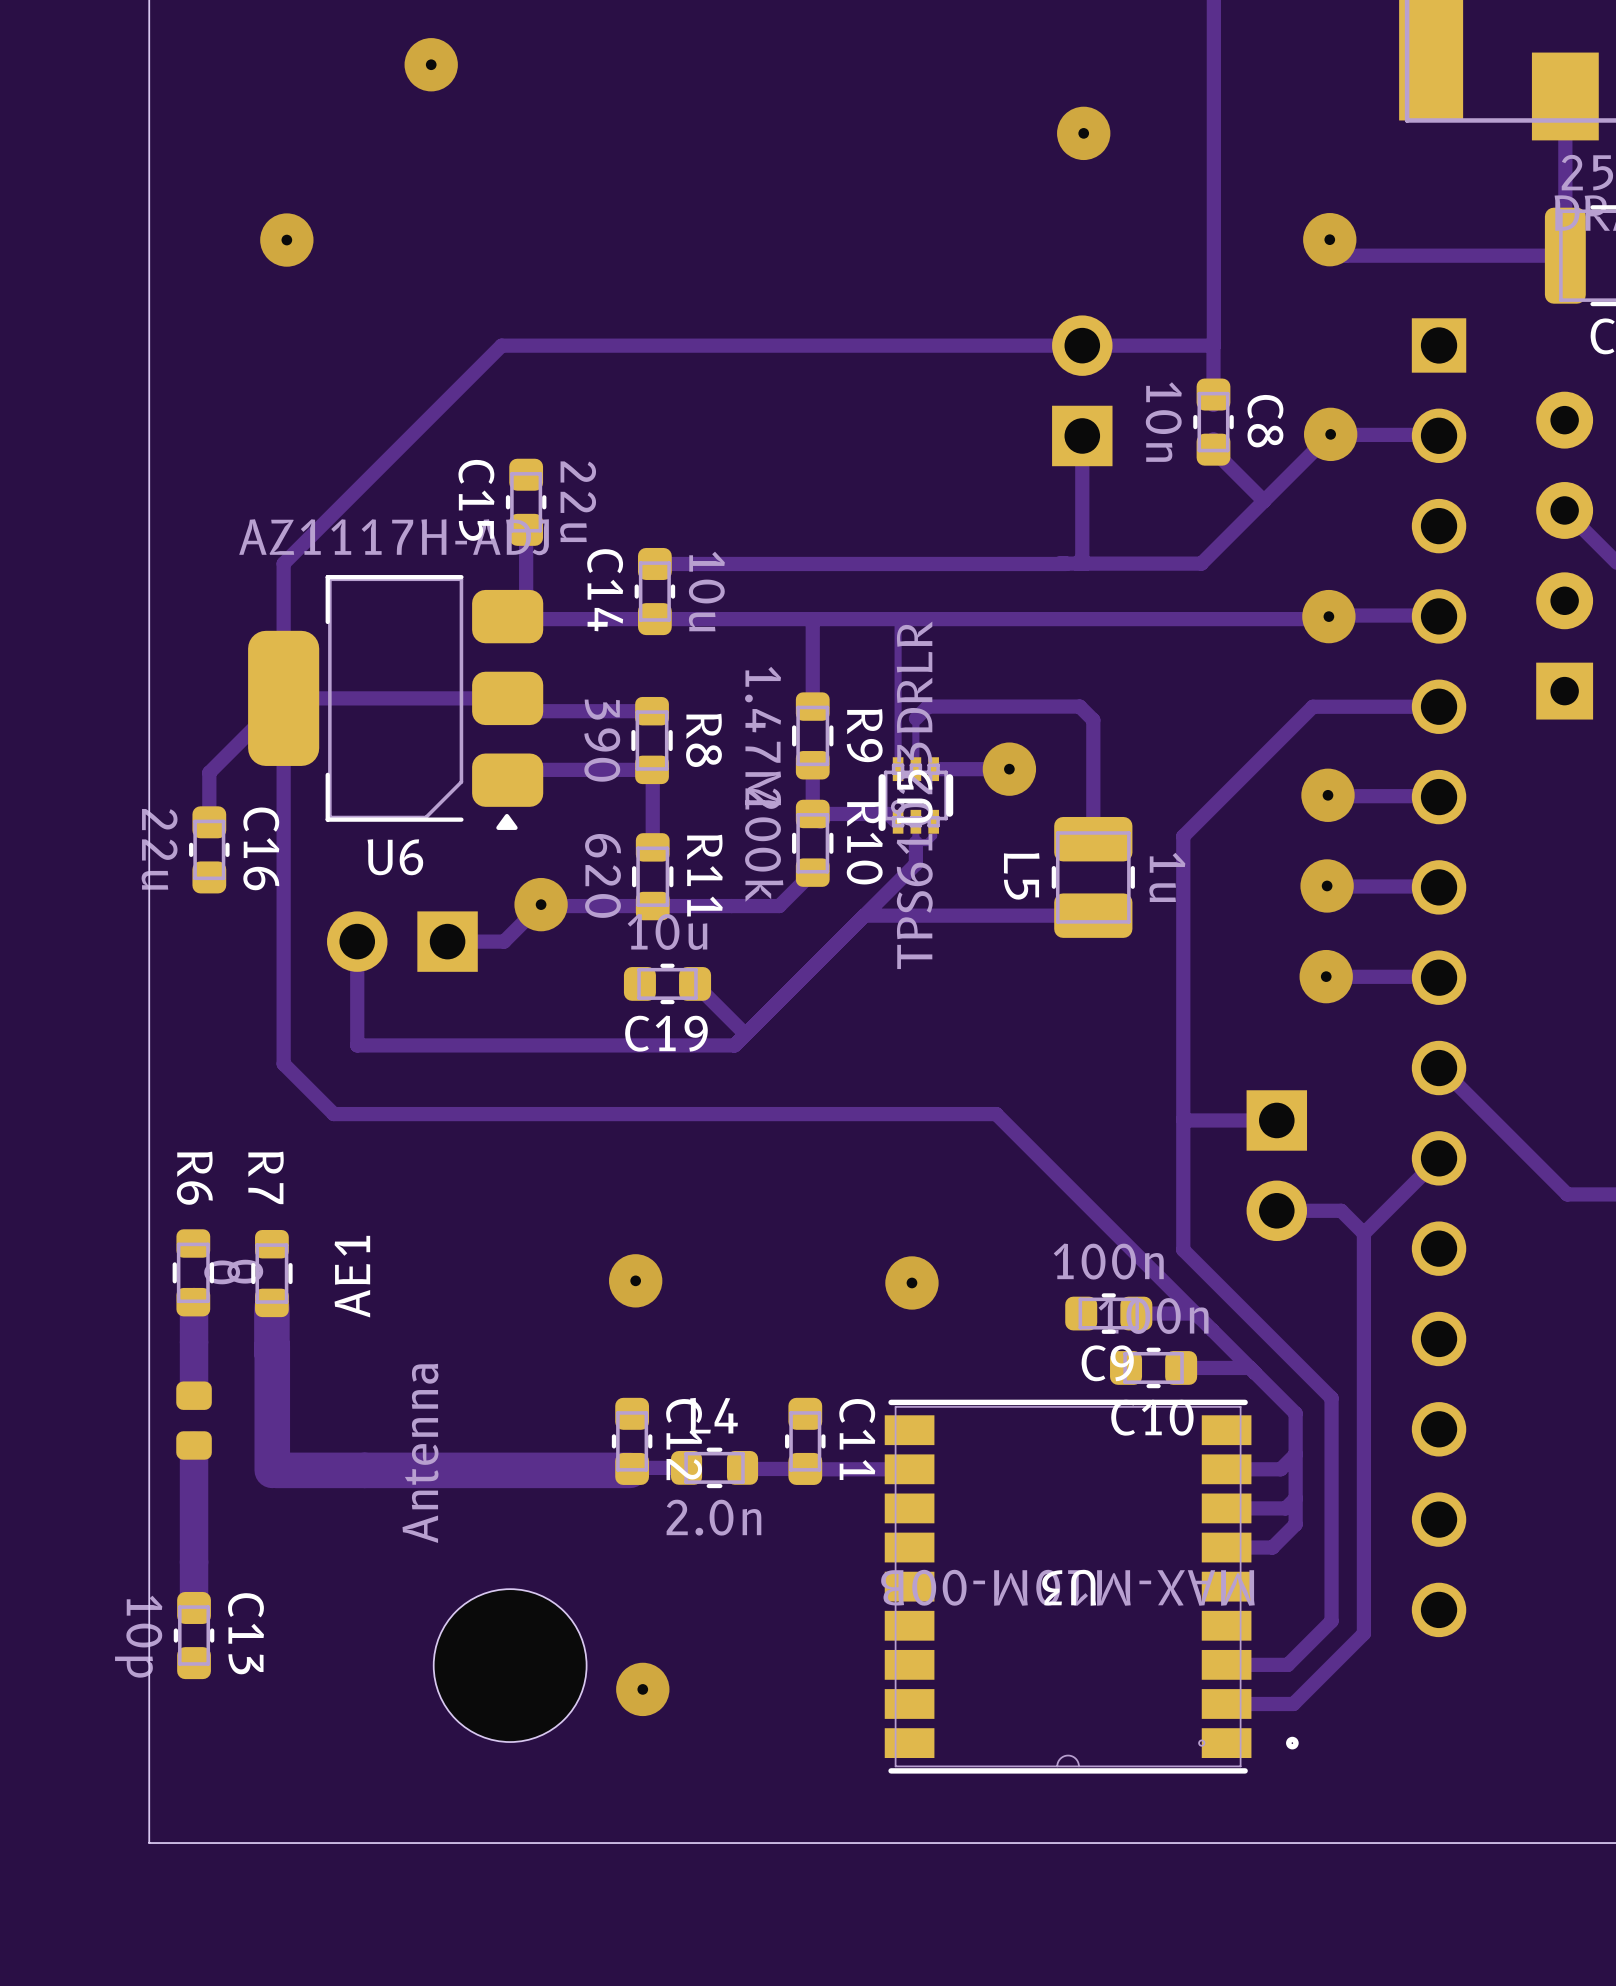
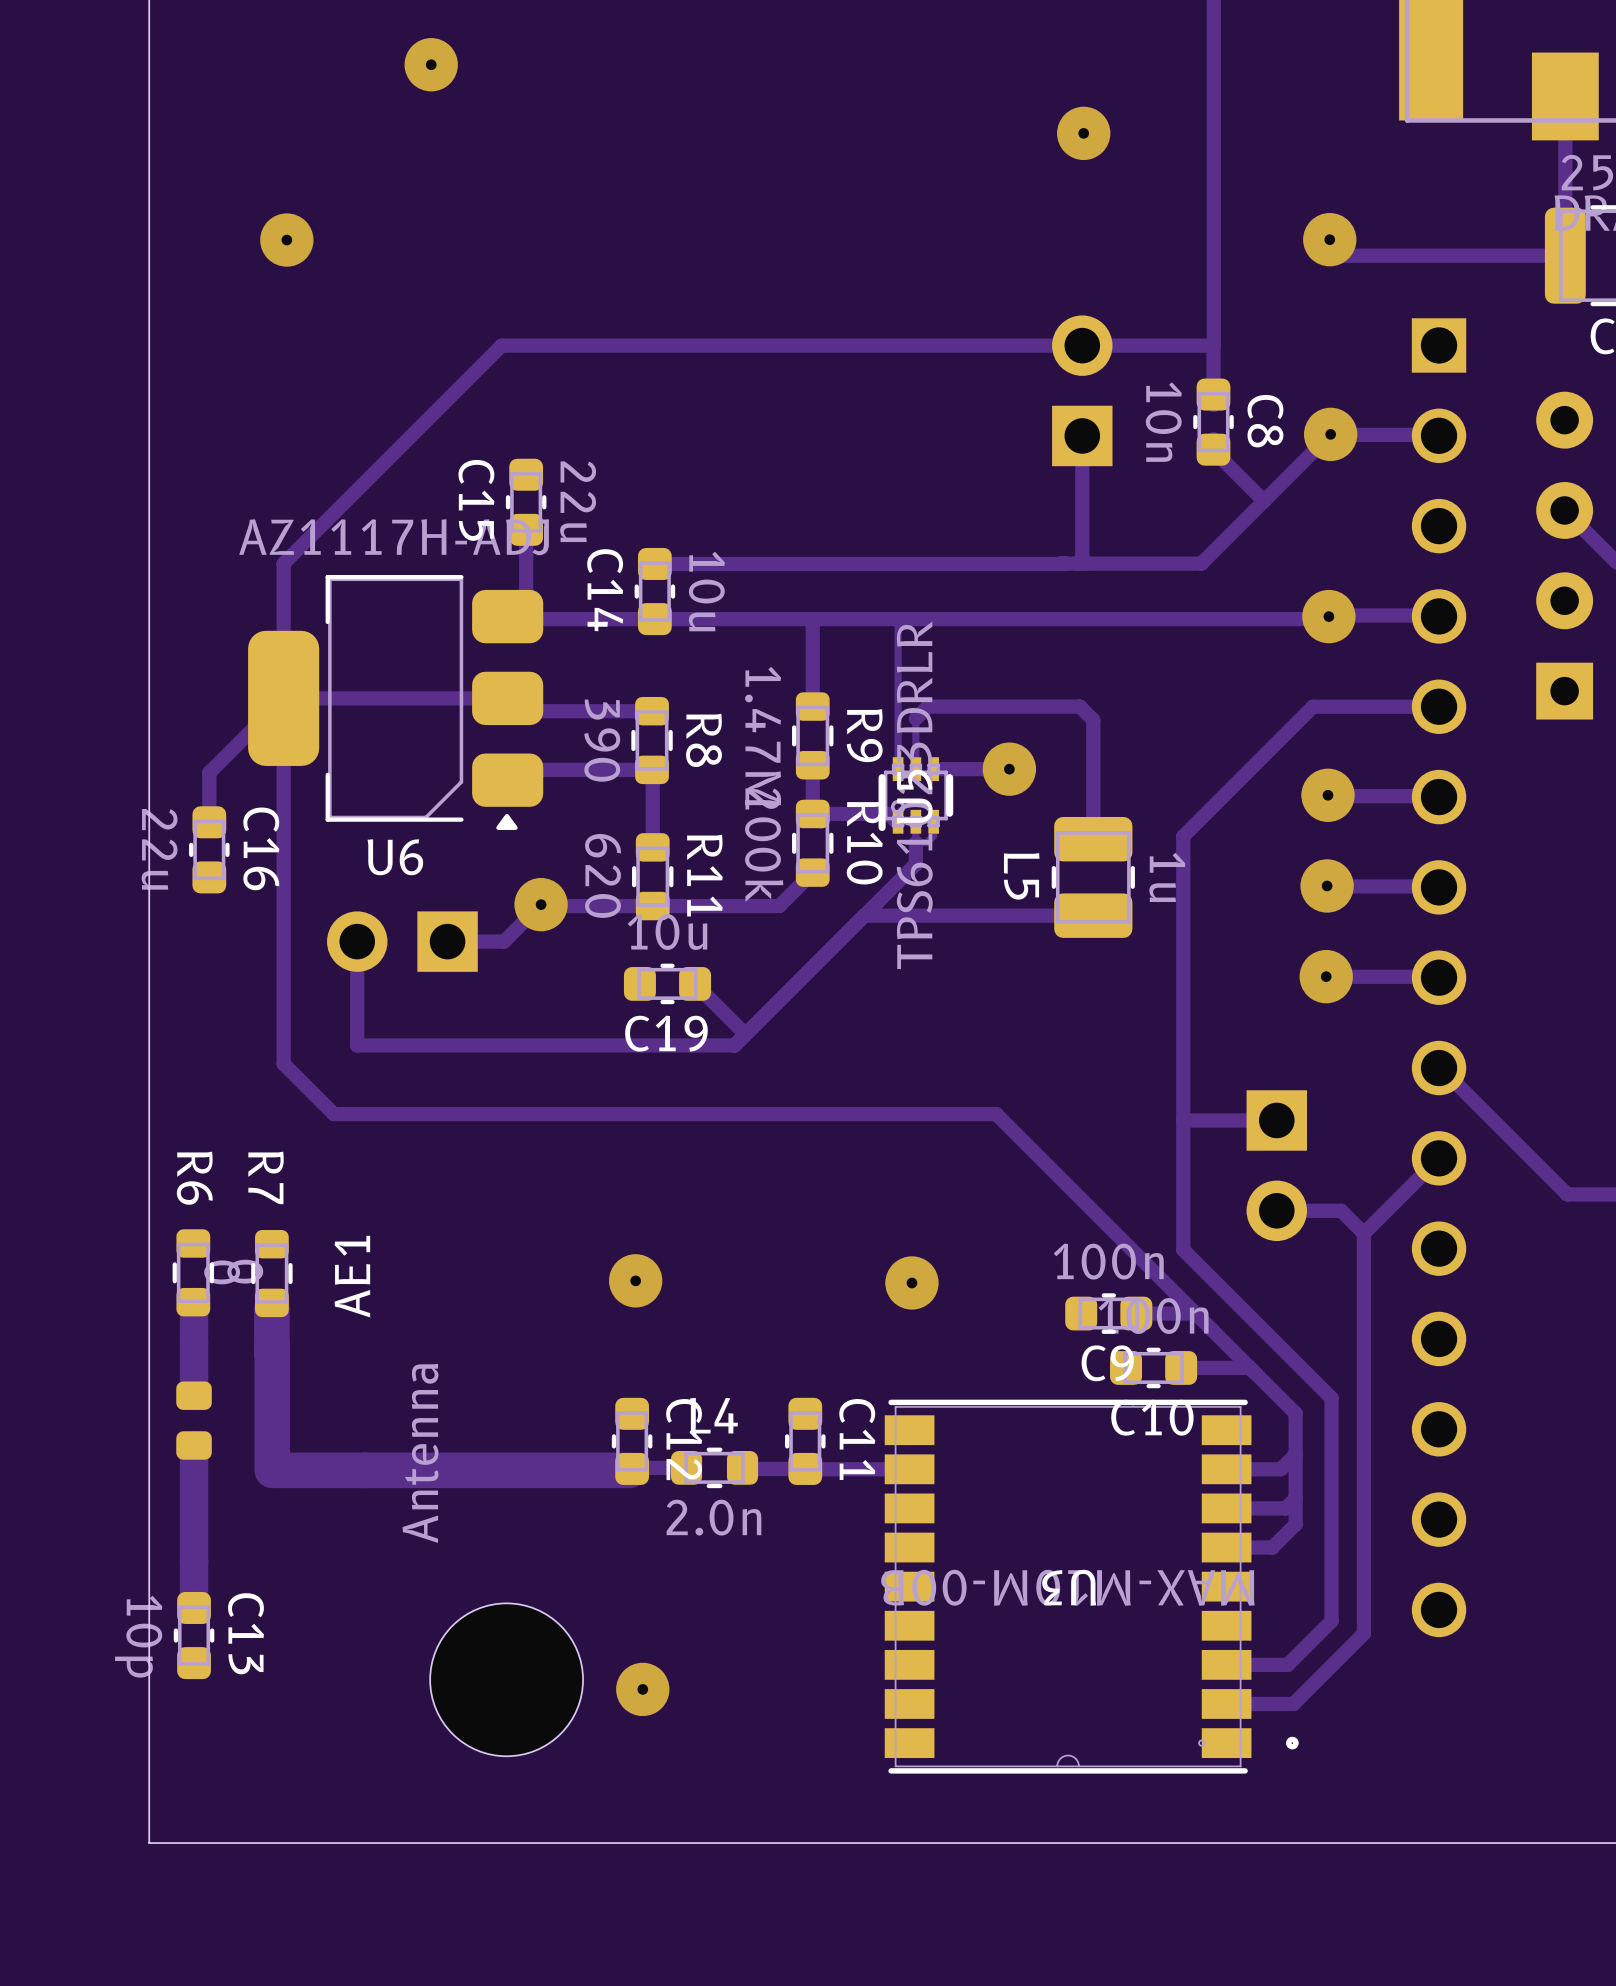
part position: (510, 1665) -> (506, 1679)

